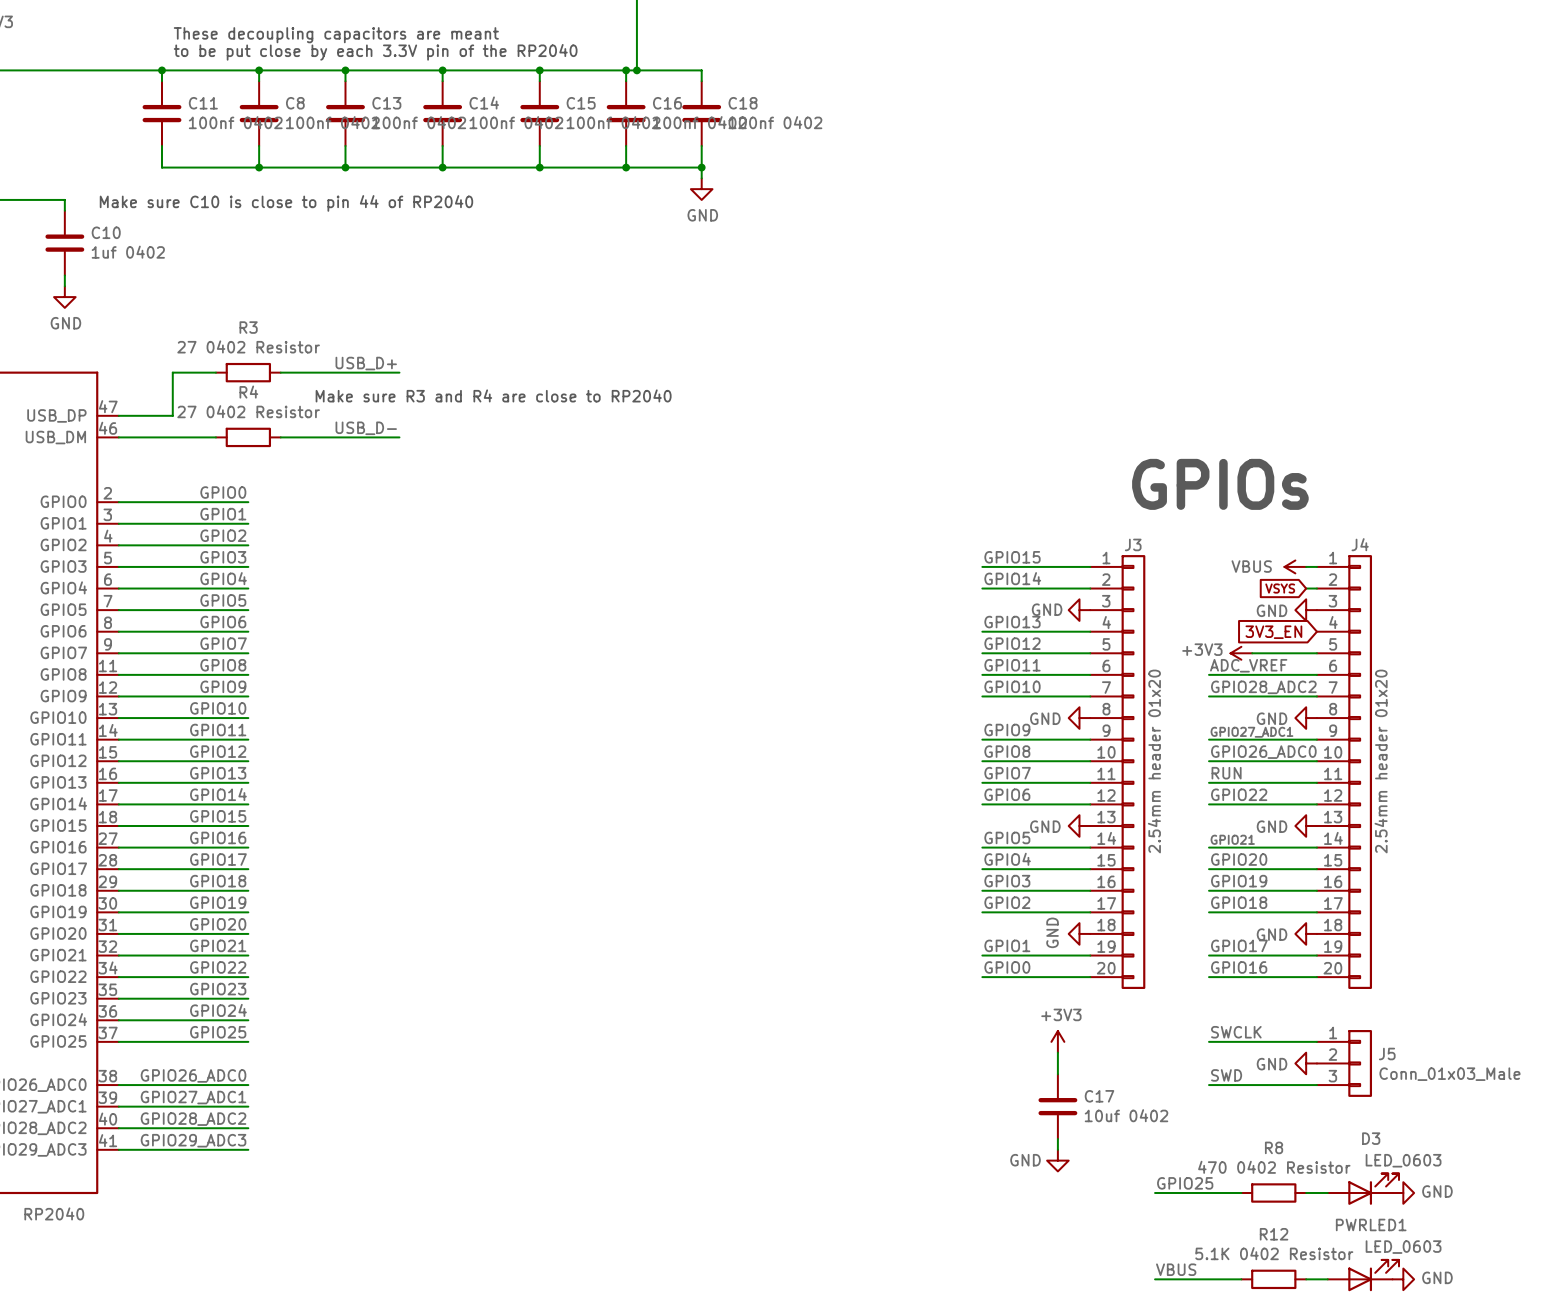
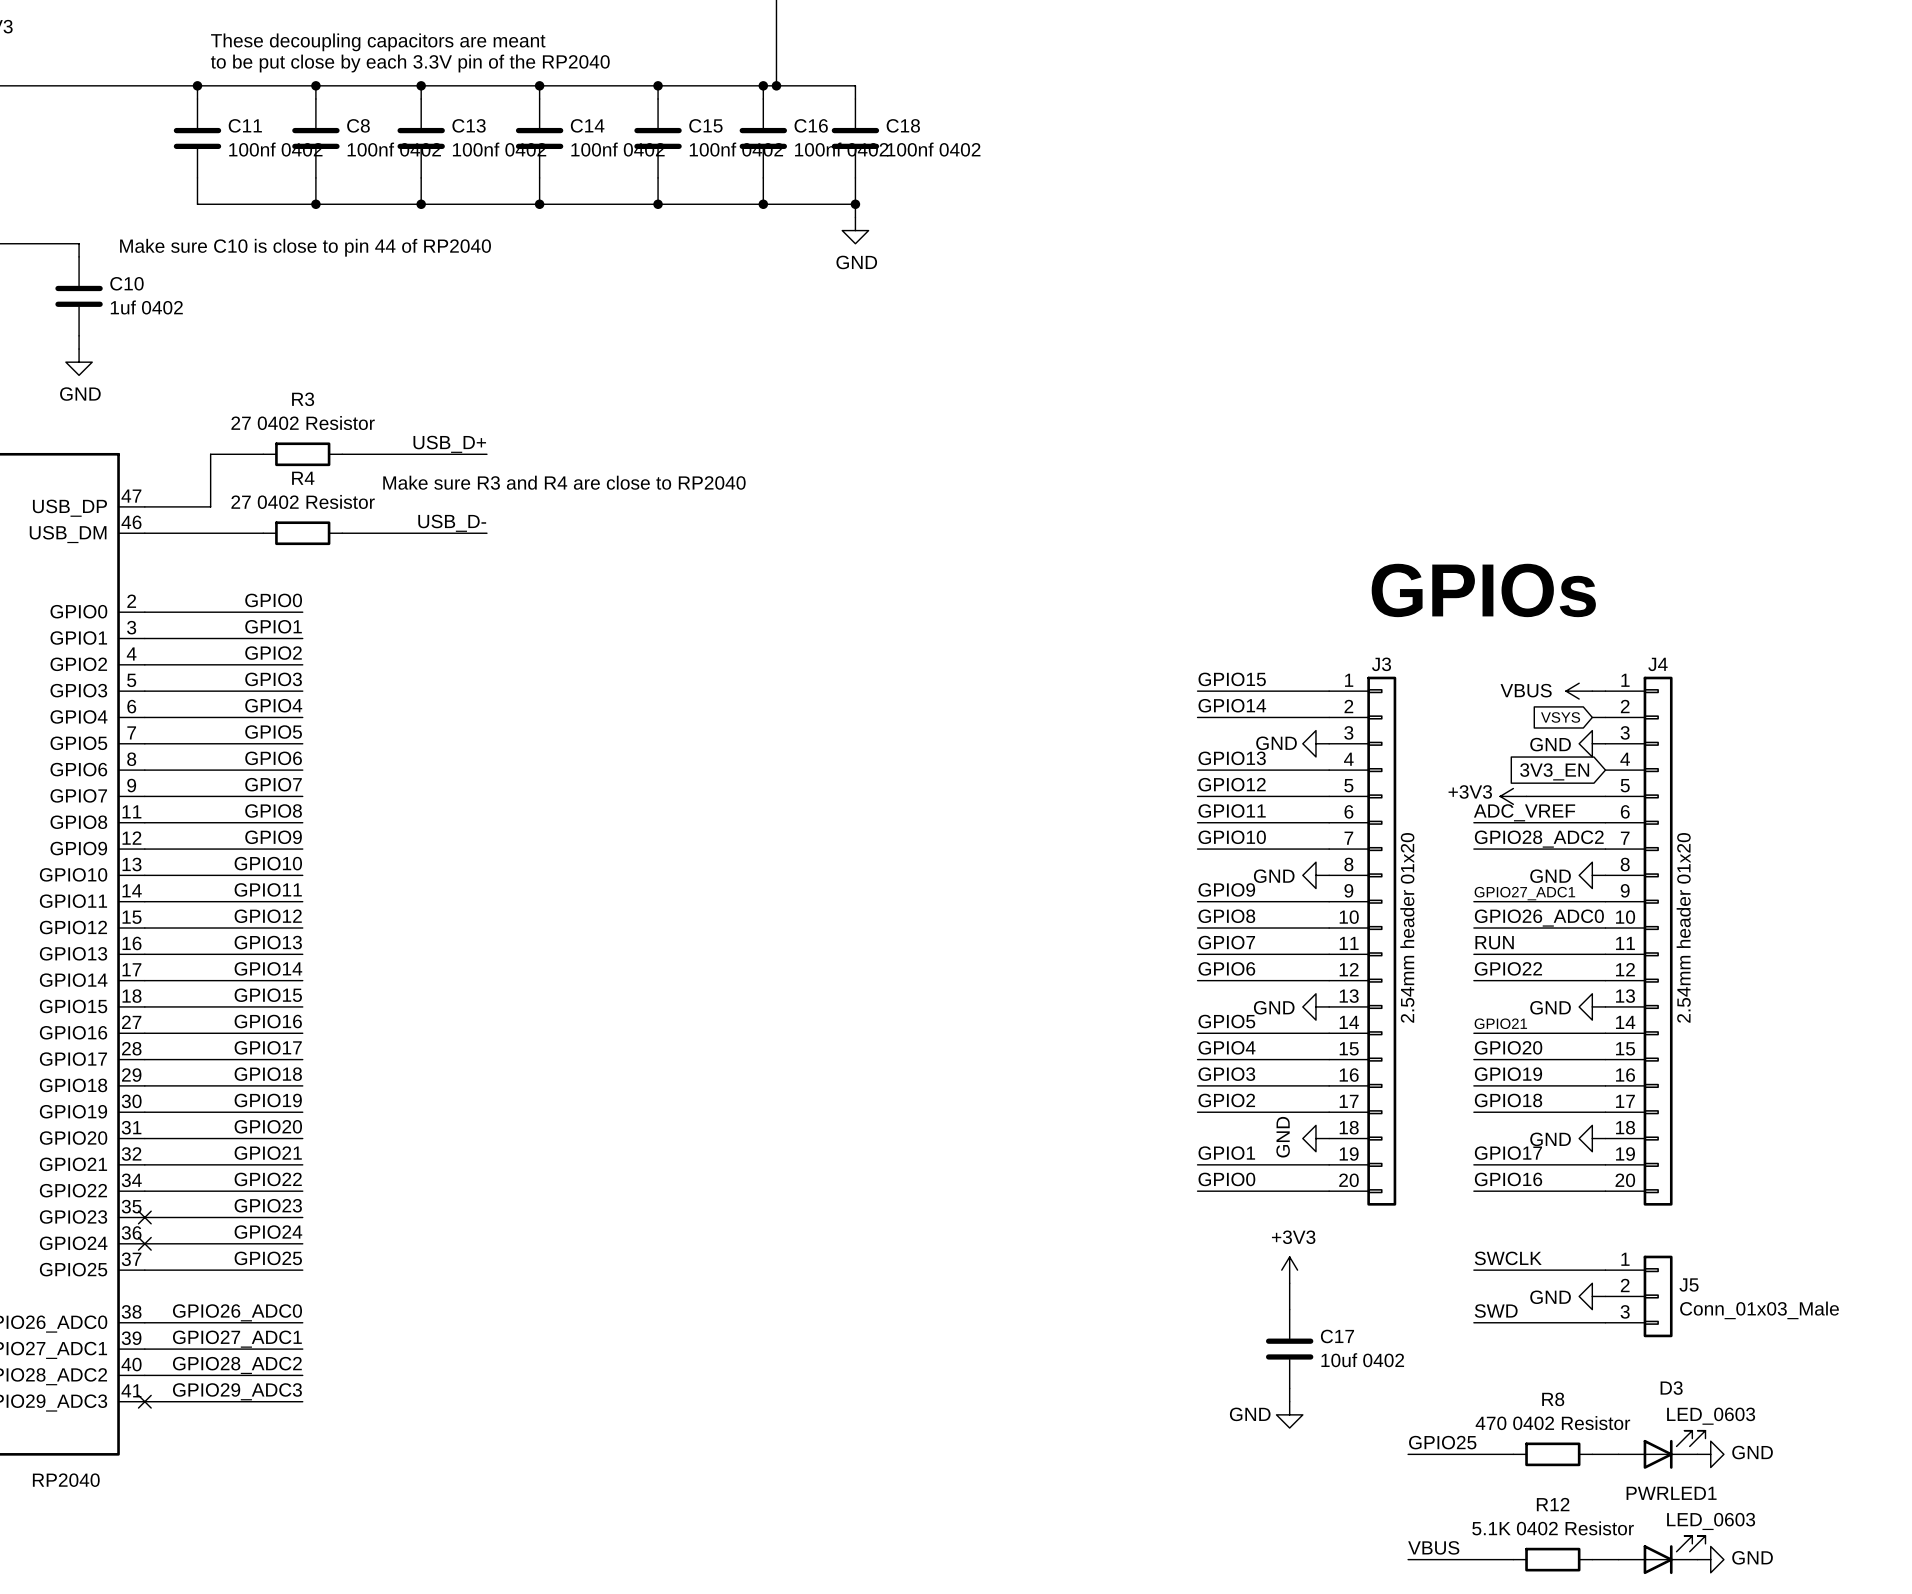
no-connect mark: none -> (144, 1217)
no-connect mark: none -> (144, 1243)
no-connect mark: none -> (144, 1401)

